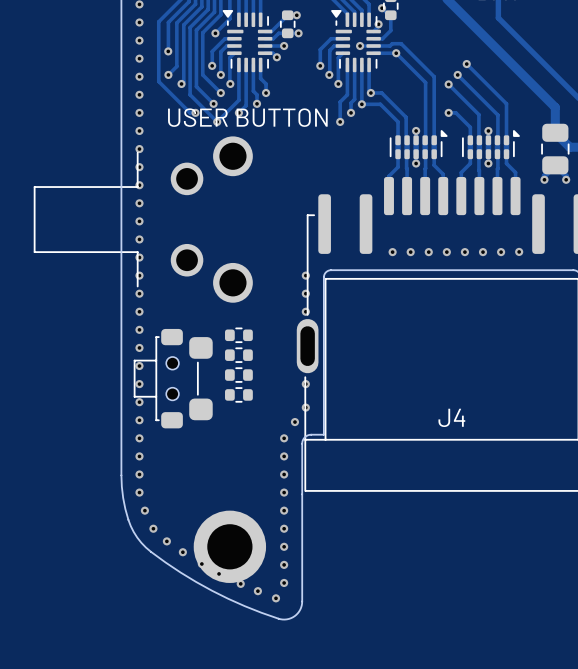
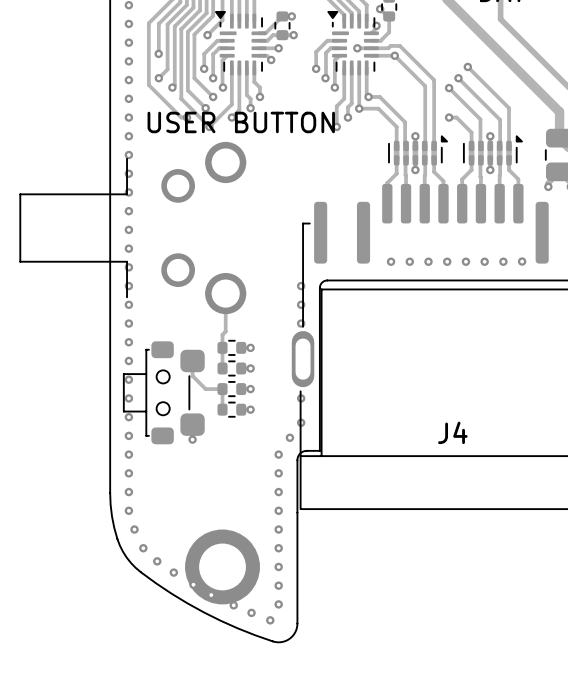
track: none -> (225, 293) (225, 331) (222, 334) (222, 368)
via: none -> (250, 347)
track: none -> (192, 360) (192, 375) (205, 389) (222, 389) (222, 409)
via: none -> (250, 368)
via: none -> (250, 389)
via: none -> (250, 409)
via: none -> (192, 439)

